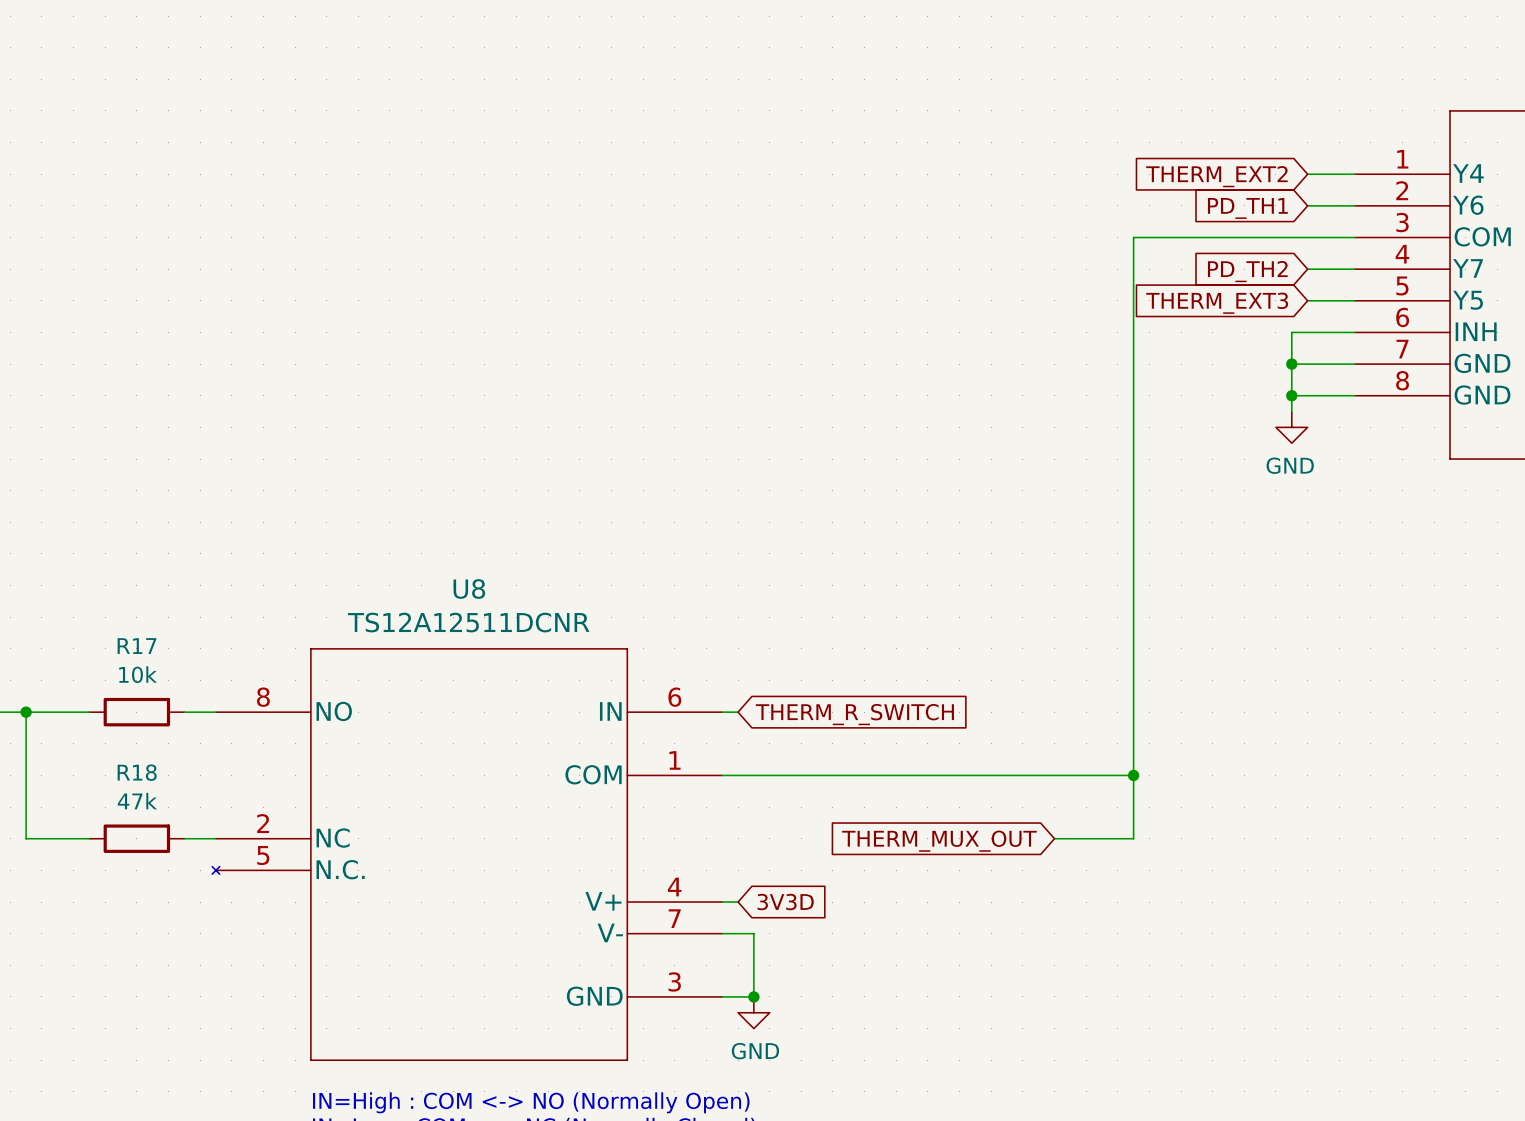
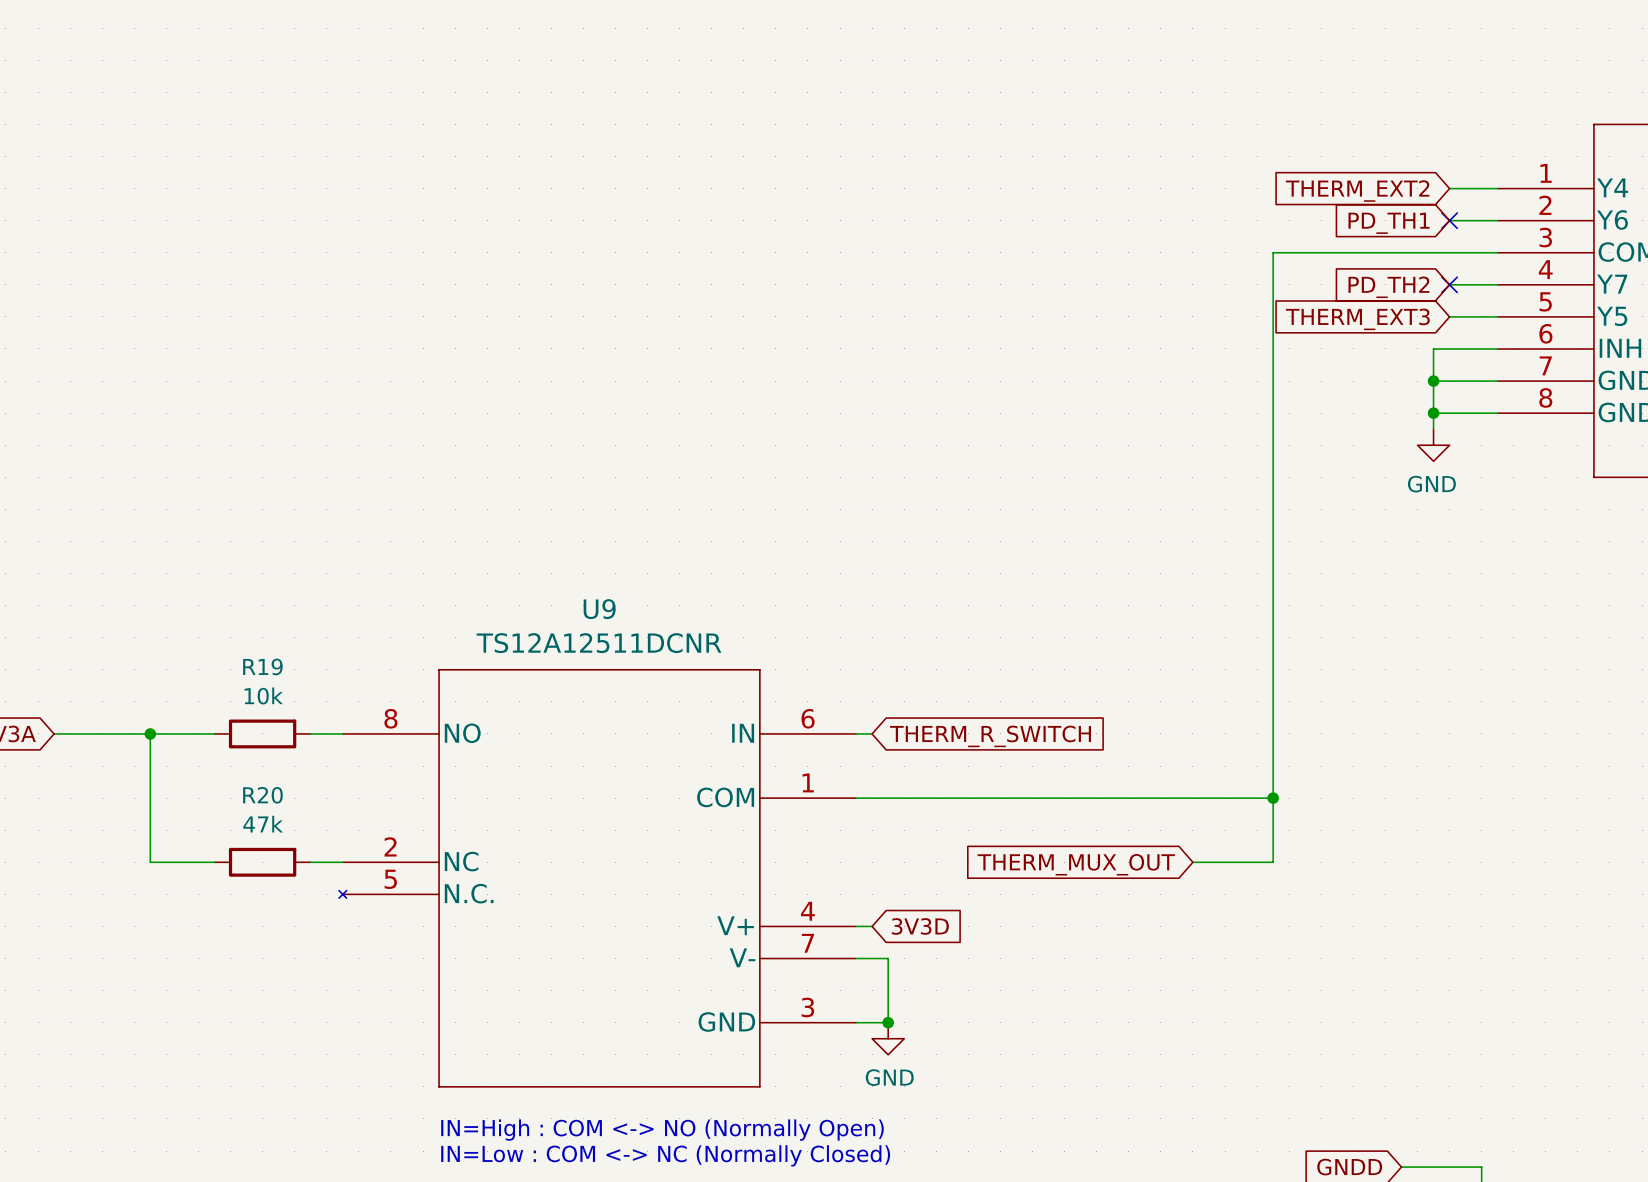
no-connect mark: none -> (1449, 220)
no-connect mark: none -> (1449, 284)
U8 name: U8 (469, 589) -> U9 (599, 609)
R17 name: R17 (136, 646) -> R19 (262, 666)
R18 name: R18 (137, 772) -> R20 (262, 795)

